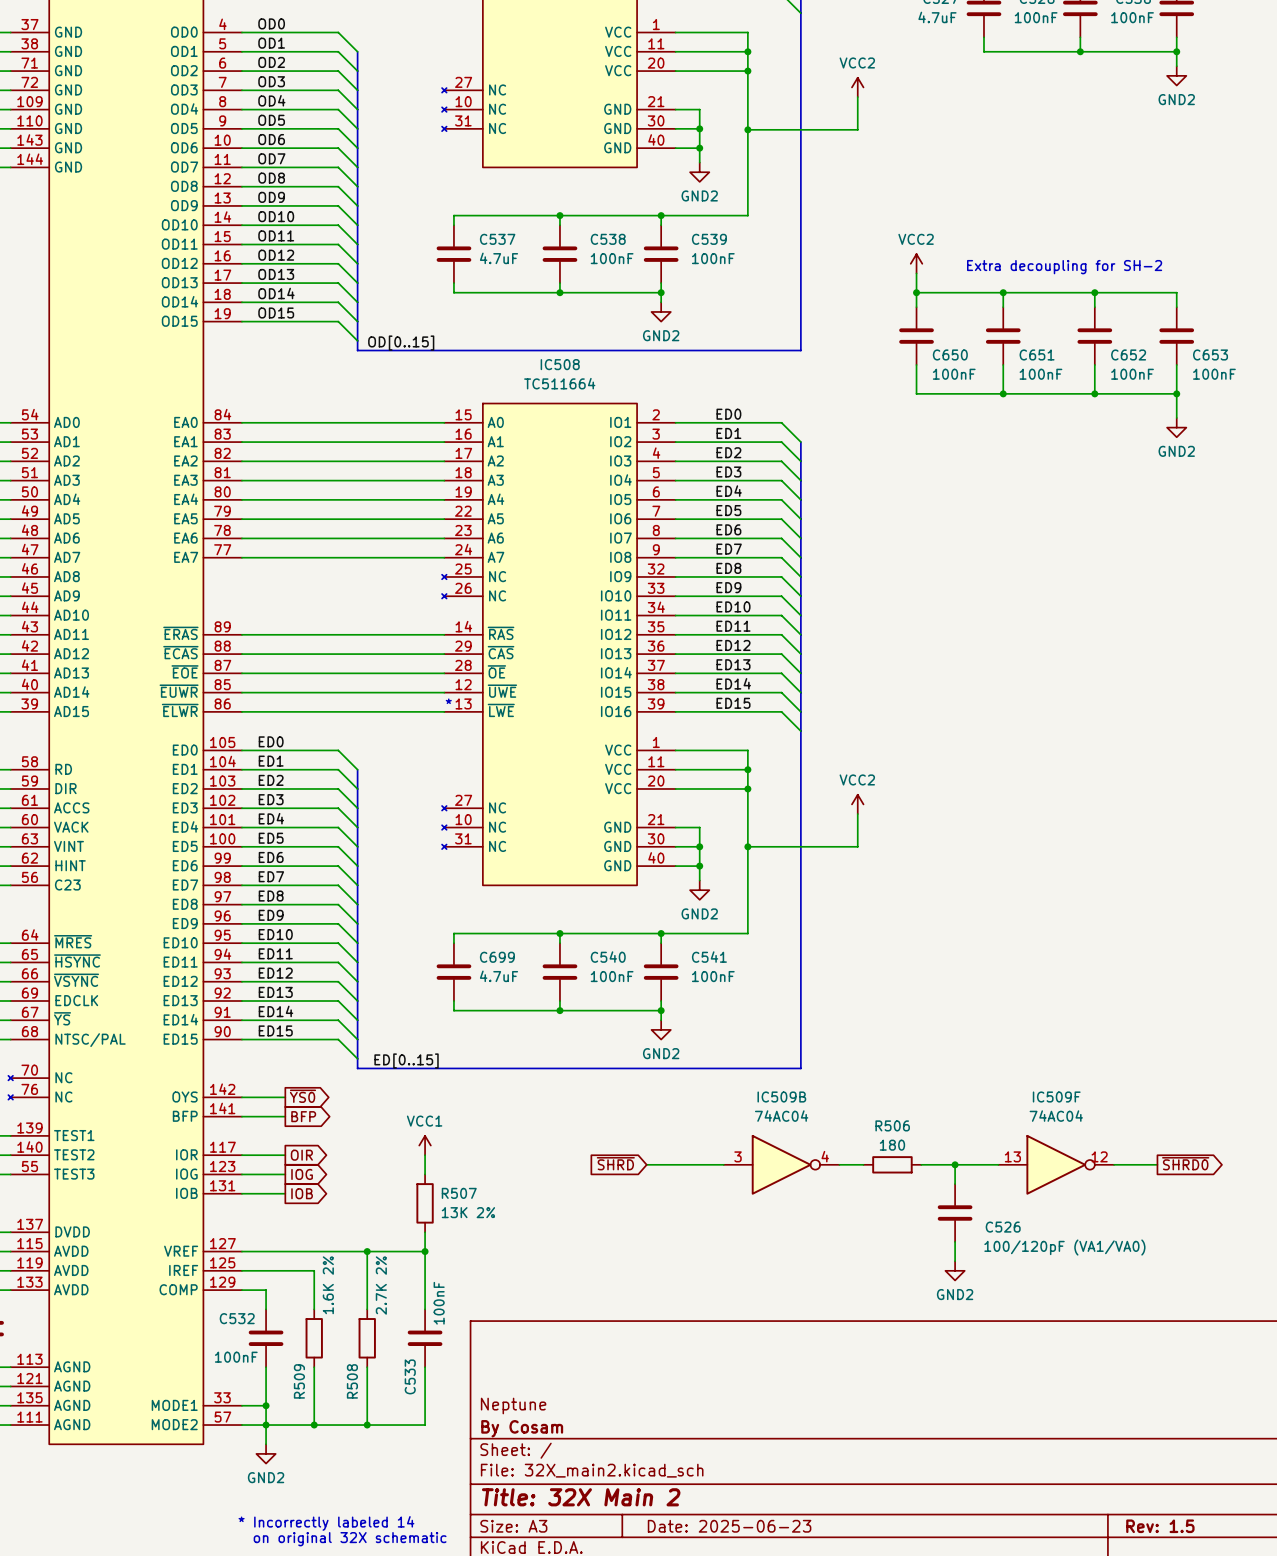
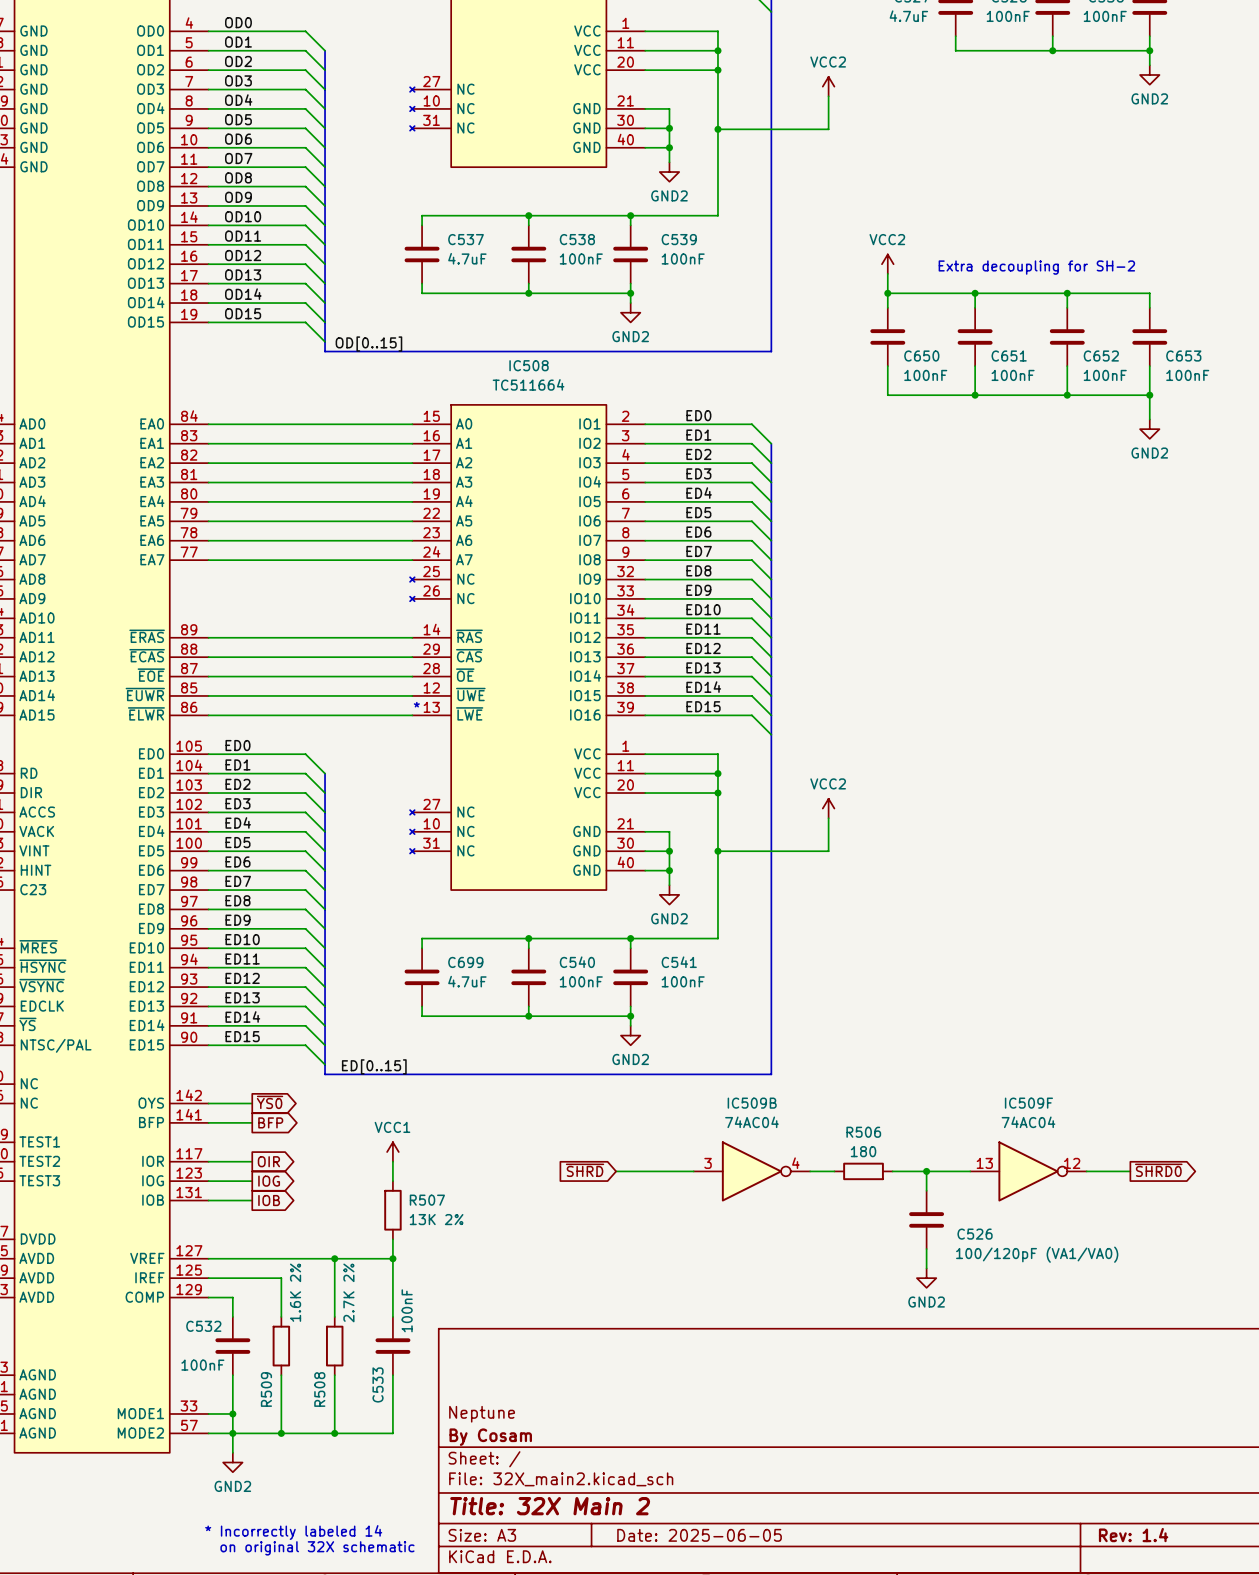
title block: Date: 2025-06-23 (729, 1526) -> Date: 2025-06-05 (699, 1535)
title block: Rev: 1.5 (1160, 1526) -> Rev: 1.4 (1133, 1535)

